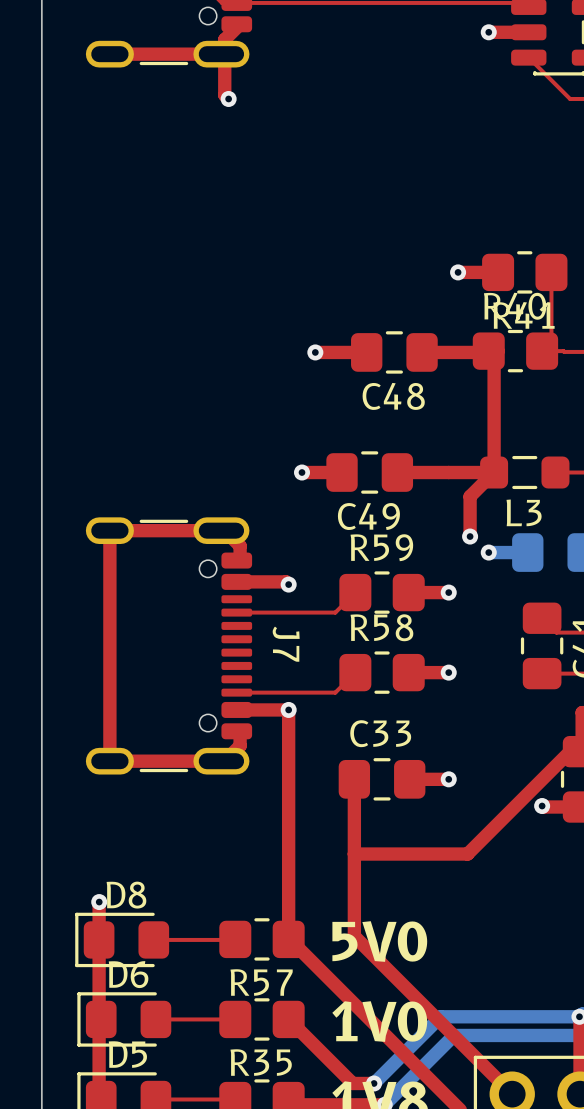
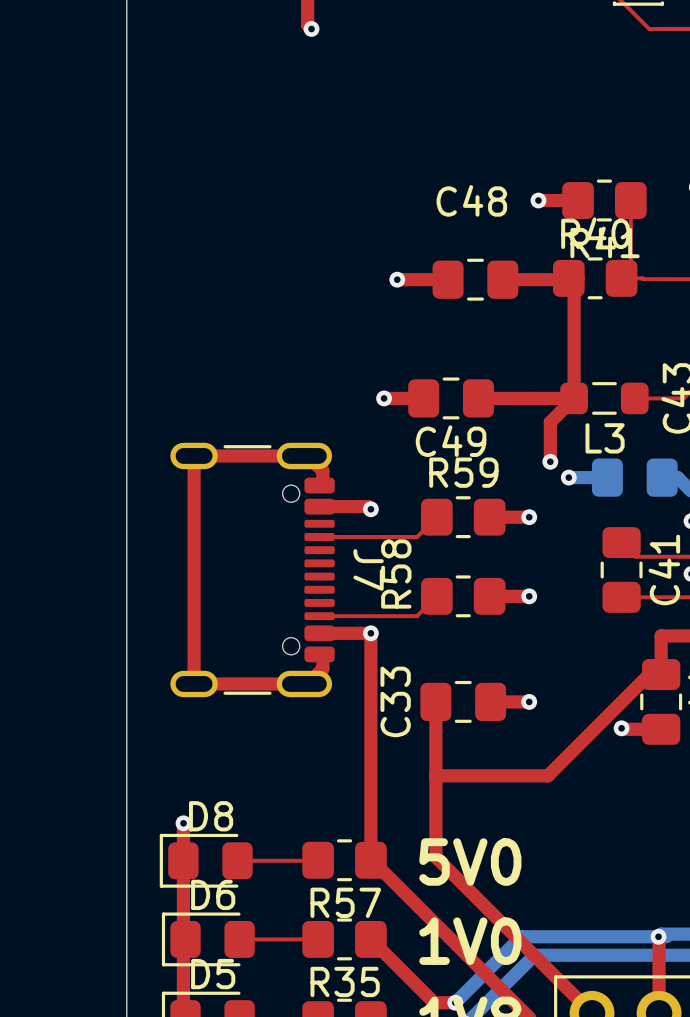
C48 name position: C48 (393, 396) -> C48 (471, 200)
R58 name rotation: 0° (381, 627) -> 90° counterclockwise (396, 573)
C33 name rotation: 0° (380, 733) -> 90° counterclockwise (395, 701)

